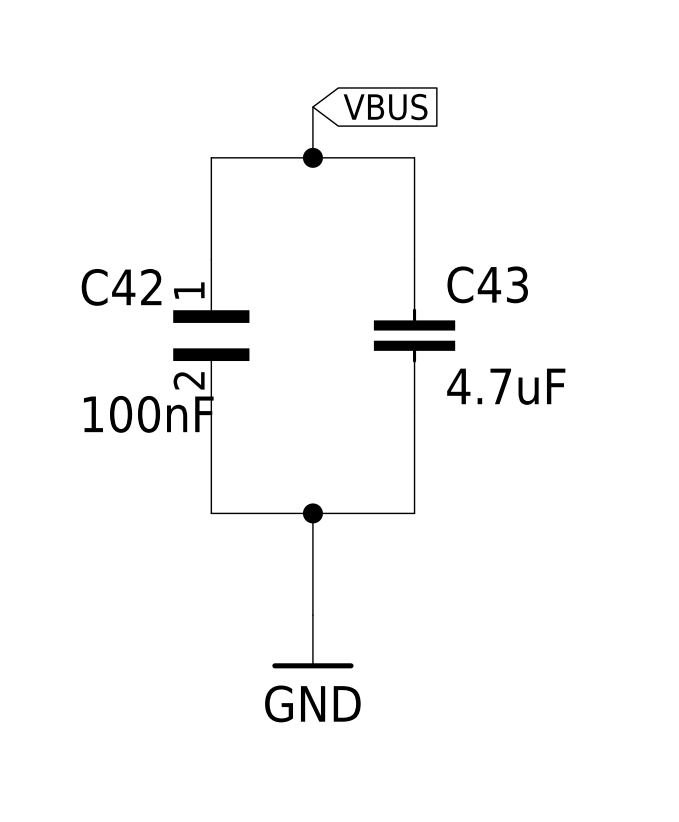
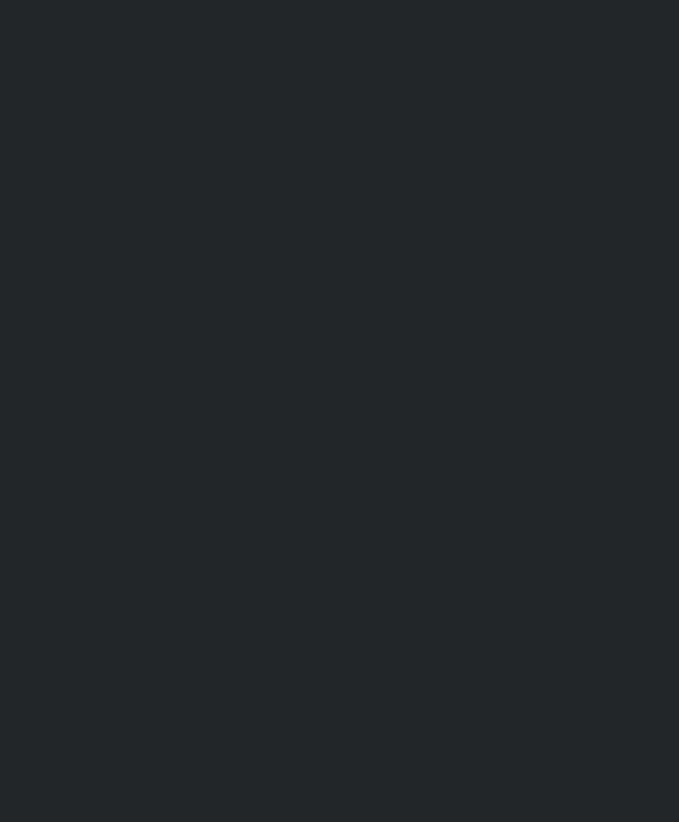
wire: (312, 107) (312, 157) -> none
global label: VBUS (385, 107) -> none
junction: (312, 157) -> none
wire: (211, 259) (211, 157) (414, 157) (414, 259) -> none
C42: 100nF (211, 335) -> none
C43: 4.7uF (414, 335) -> none
wire: (211, 411) (211, 513) (414, 513) (414, 411) -> none
wire: (312, 513) (312, 615) -> none
junction: (312, 513) -> none
power symbol: GND (312, 641) -> none

